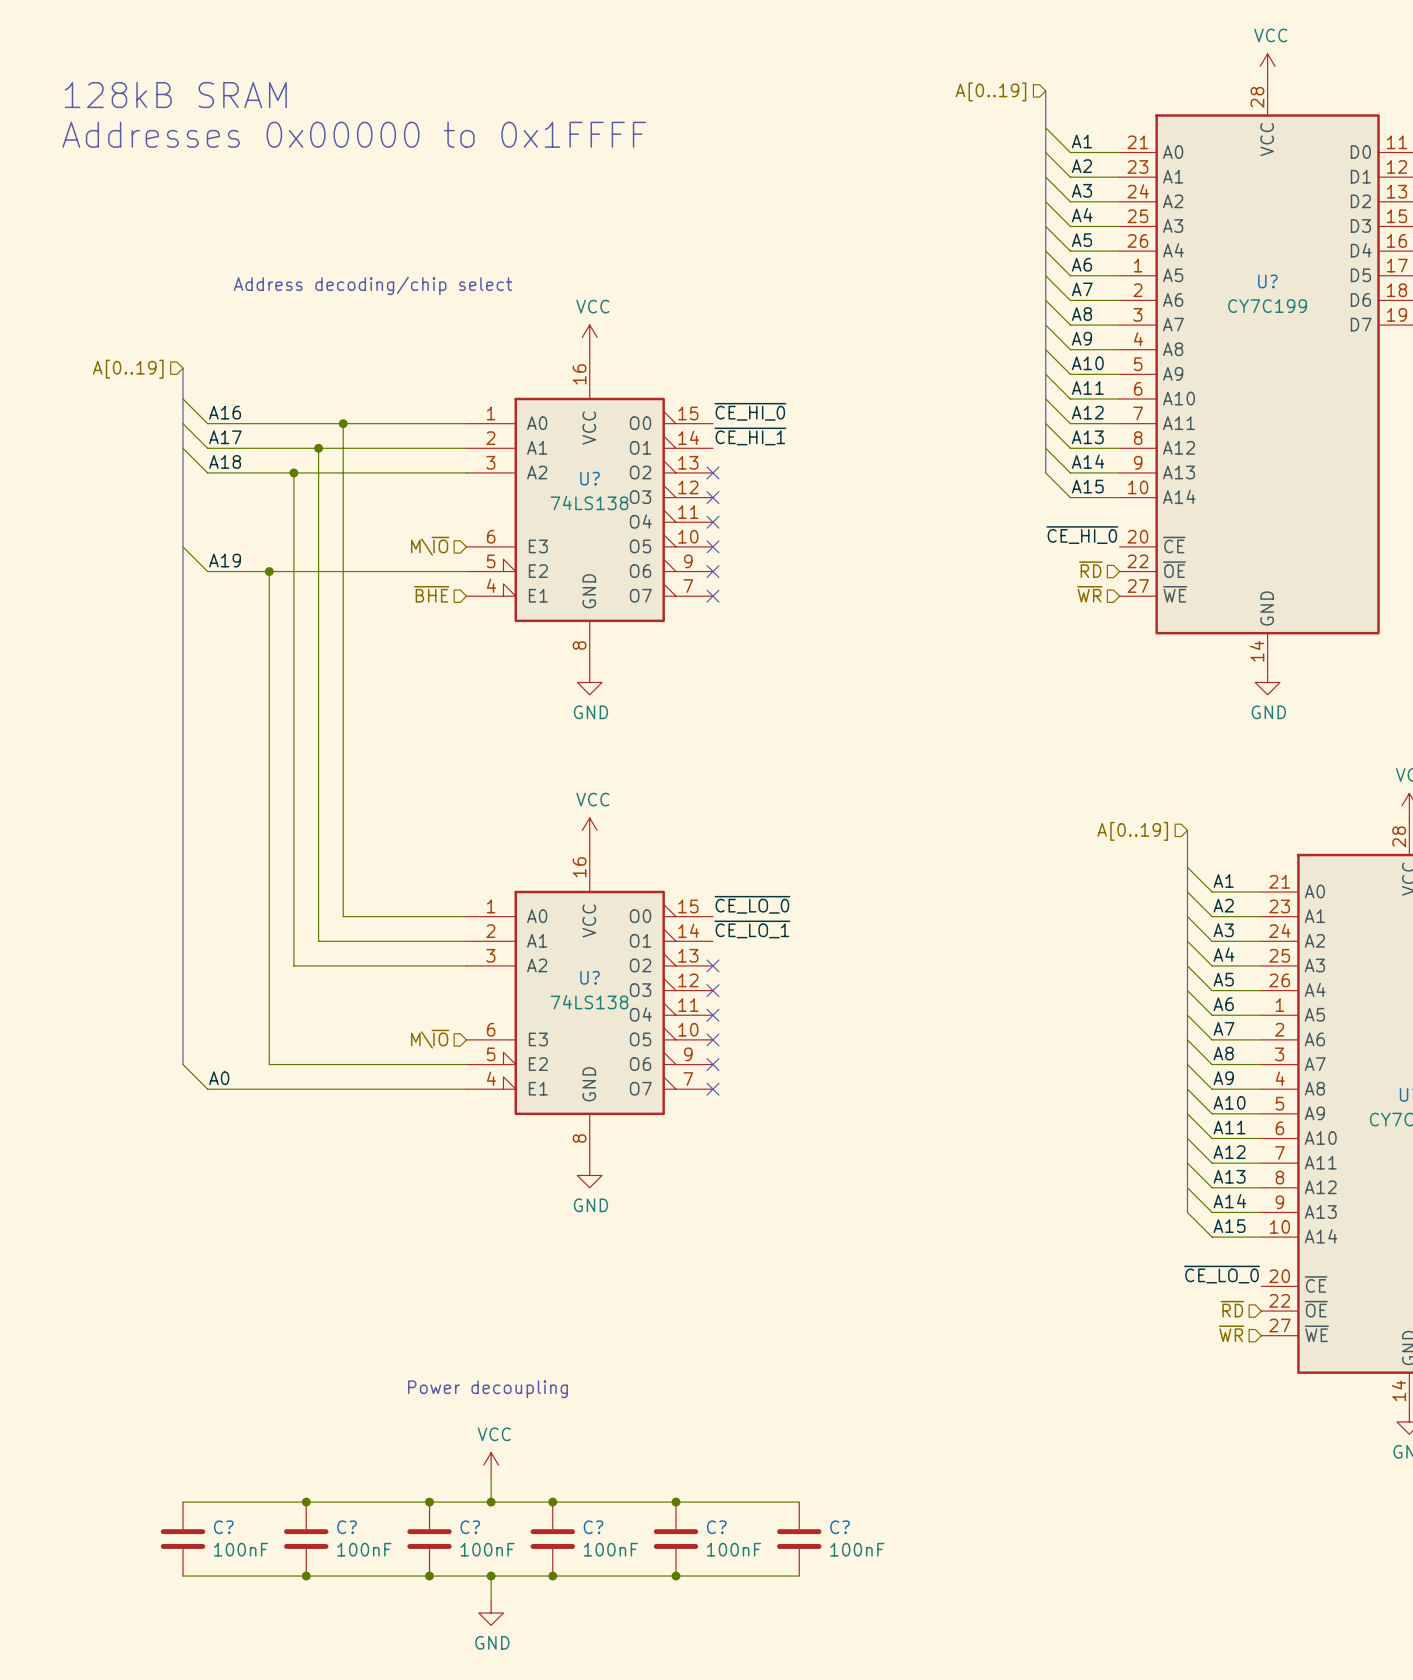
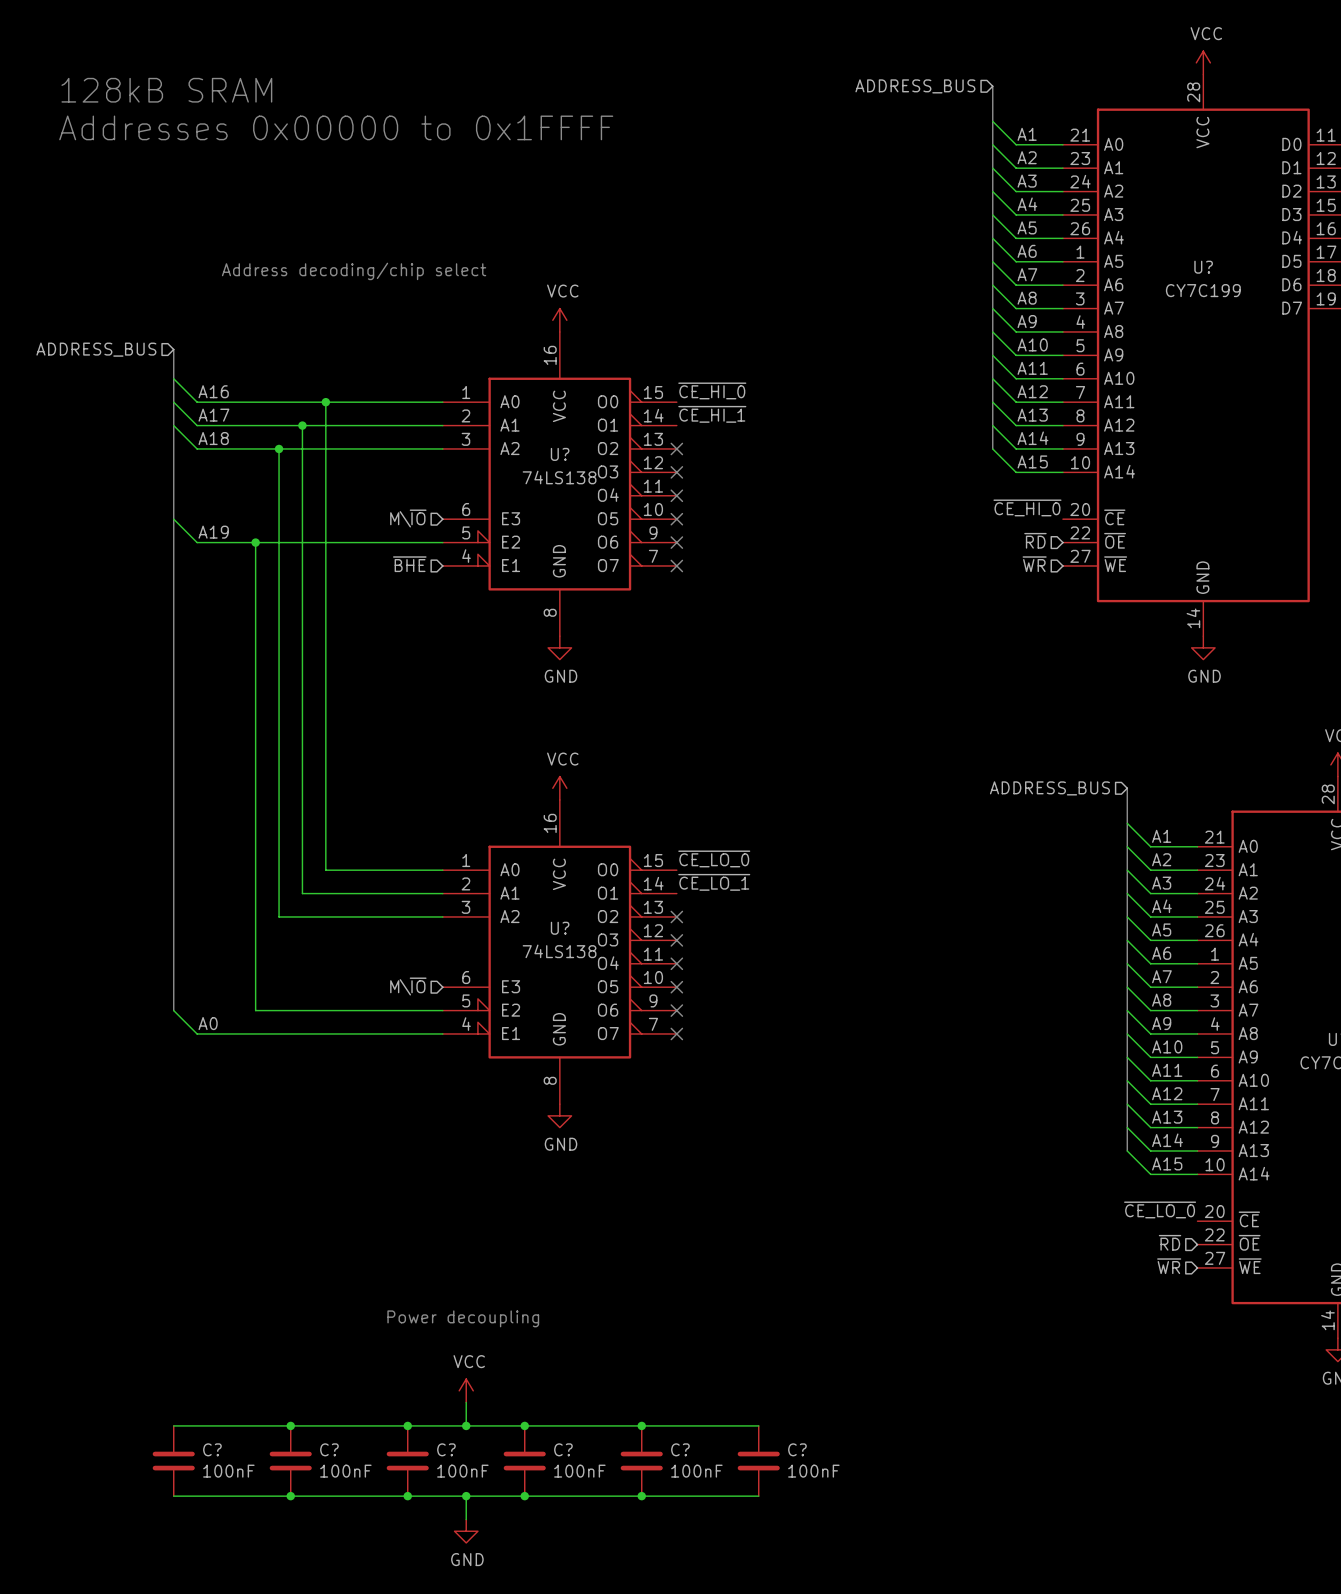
hierarchical label: A[0..19] (990, 91) -> ADDRESS_BUS (915, 86)
hierarchical label: A[0..19] (128, 369) -> ADDRESS_BUS (96, 349)
hierarchical label: A[0..19] (1132, 831) -> ADDRESS_BUS (1049, 788)

